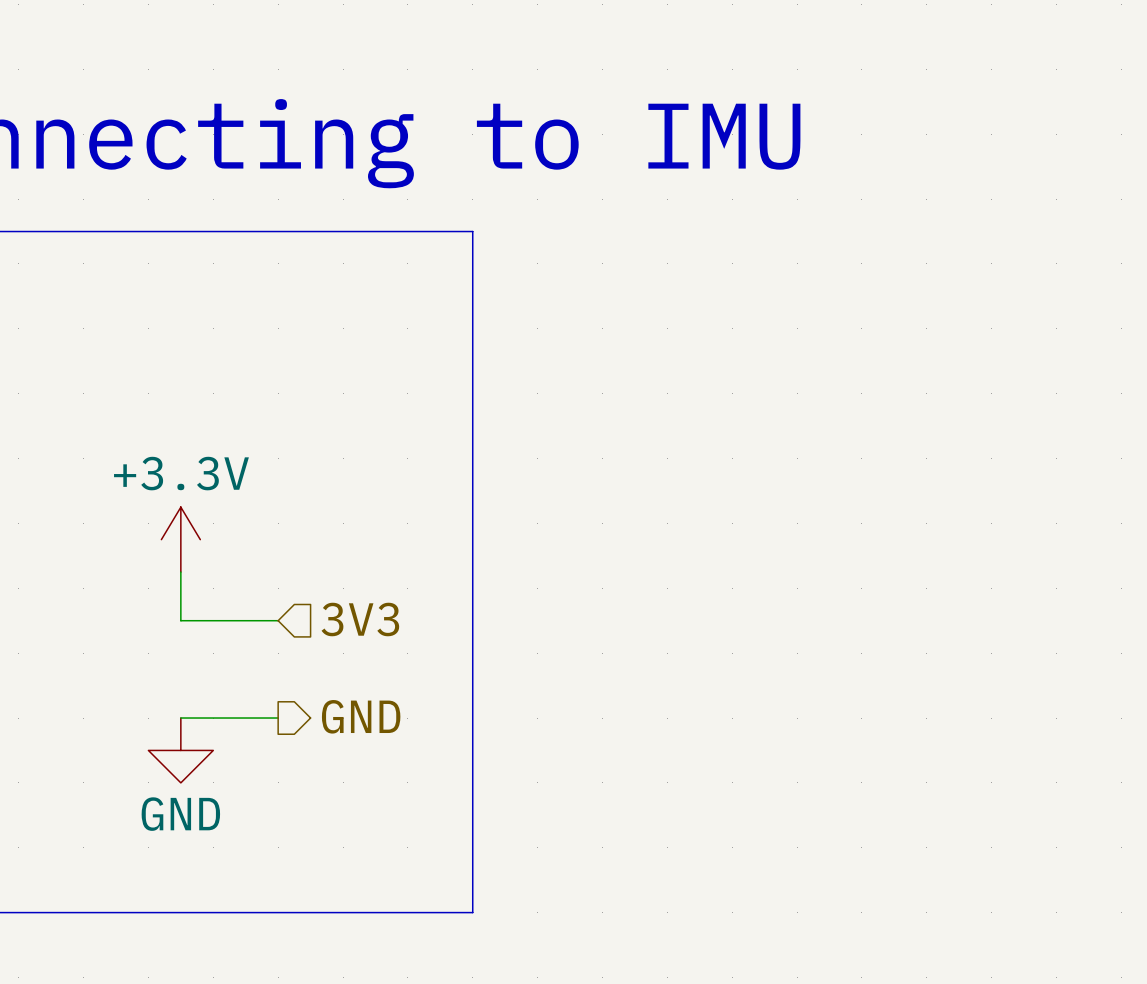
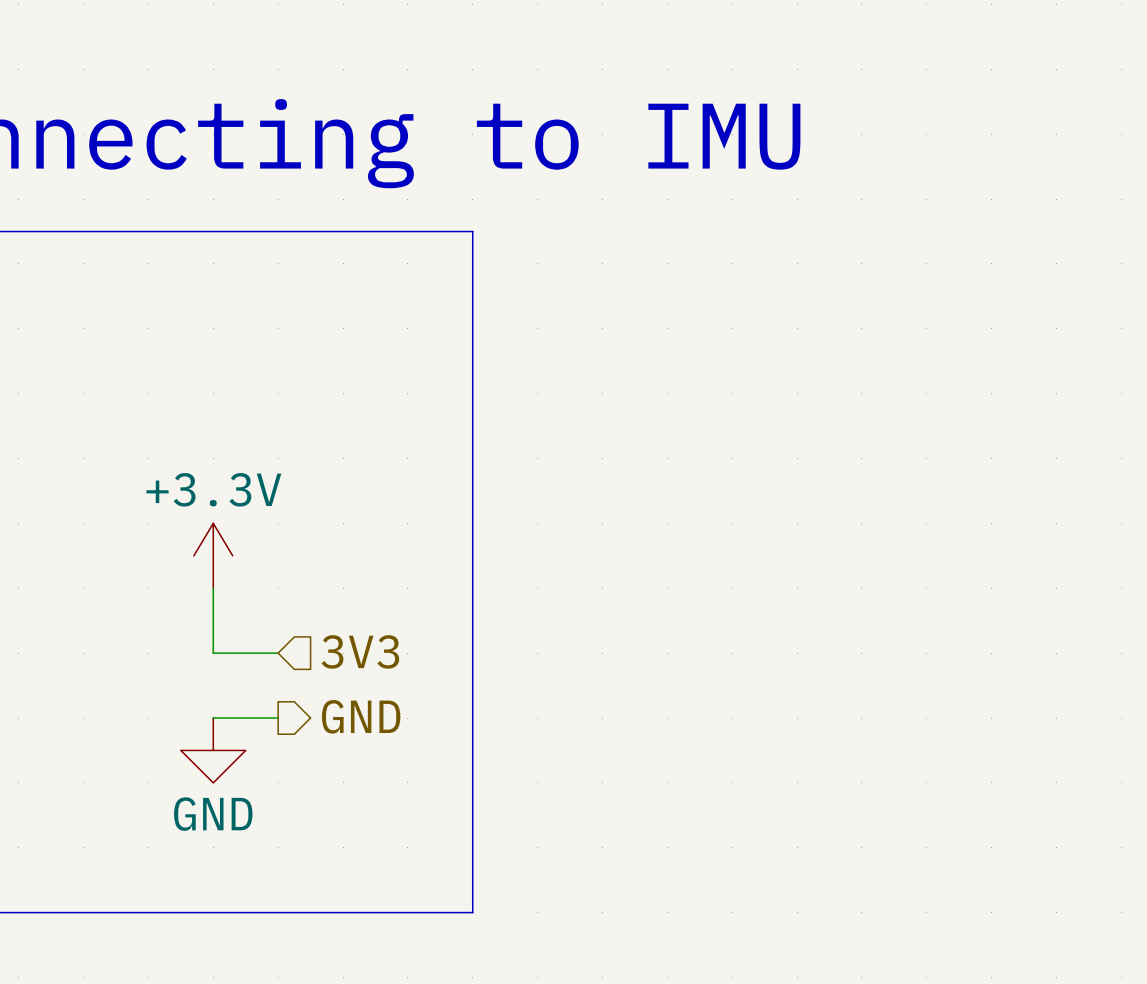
power symbol position: +3.3V (180, 539) -> +3.3V (213, 555)
wire: (180, 572) (180, 620) (278, 620) -> none
wire: none -> (213, 588) (213, 653) (278, 653)
hierarchical label position: 3V3 (360, 619) -> 3V3 (360, 651)
wire: (180, 718) (213, 718) -> none
power symbol position: GND (180, 750) -> GND (213, 750)

